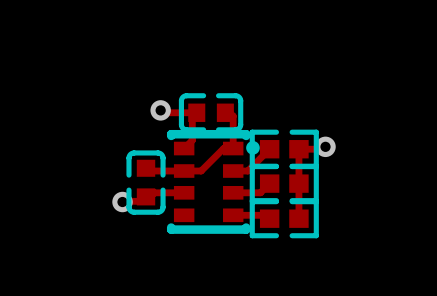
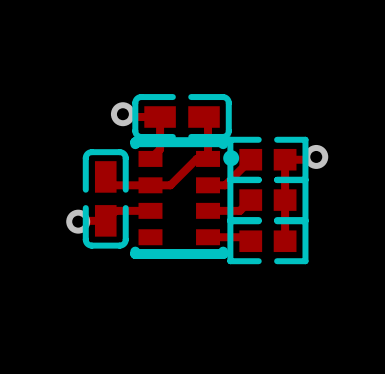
part footprint: [178, 93, 244, 133] -> [132, 94, 232, 140]
part footprint: [126, 150, 166, 215] -> [82, 149, 129, 249]

